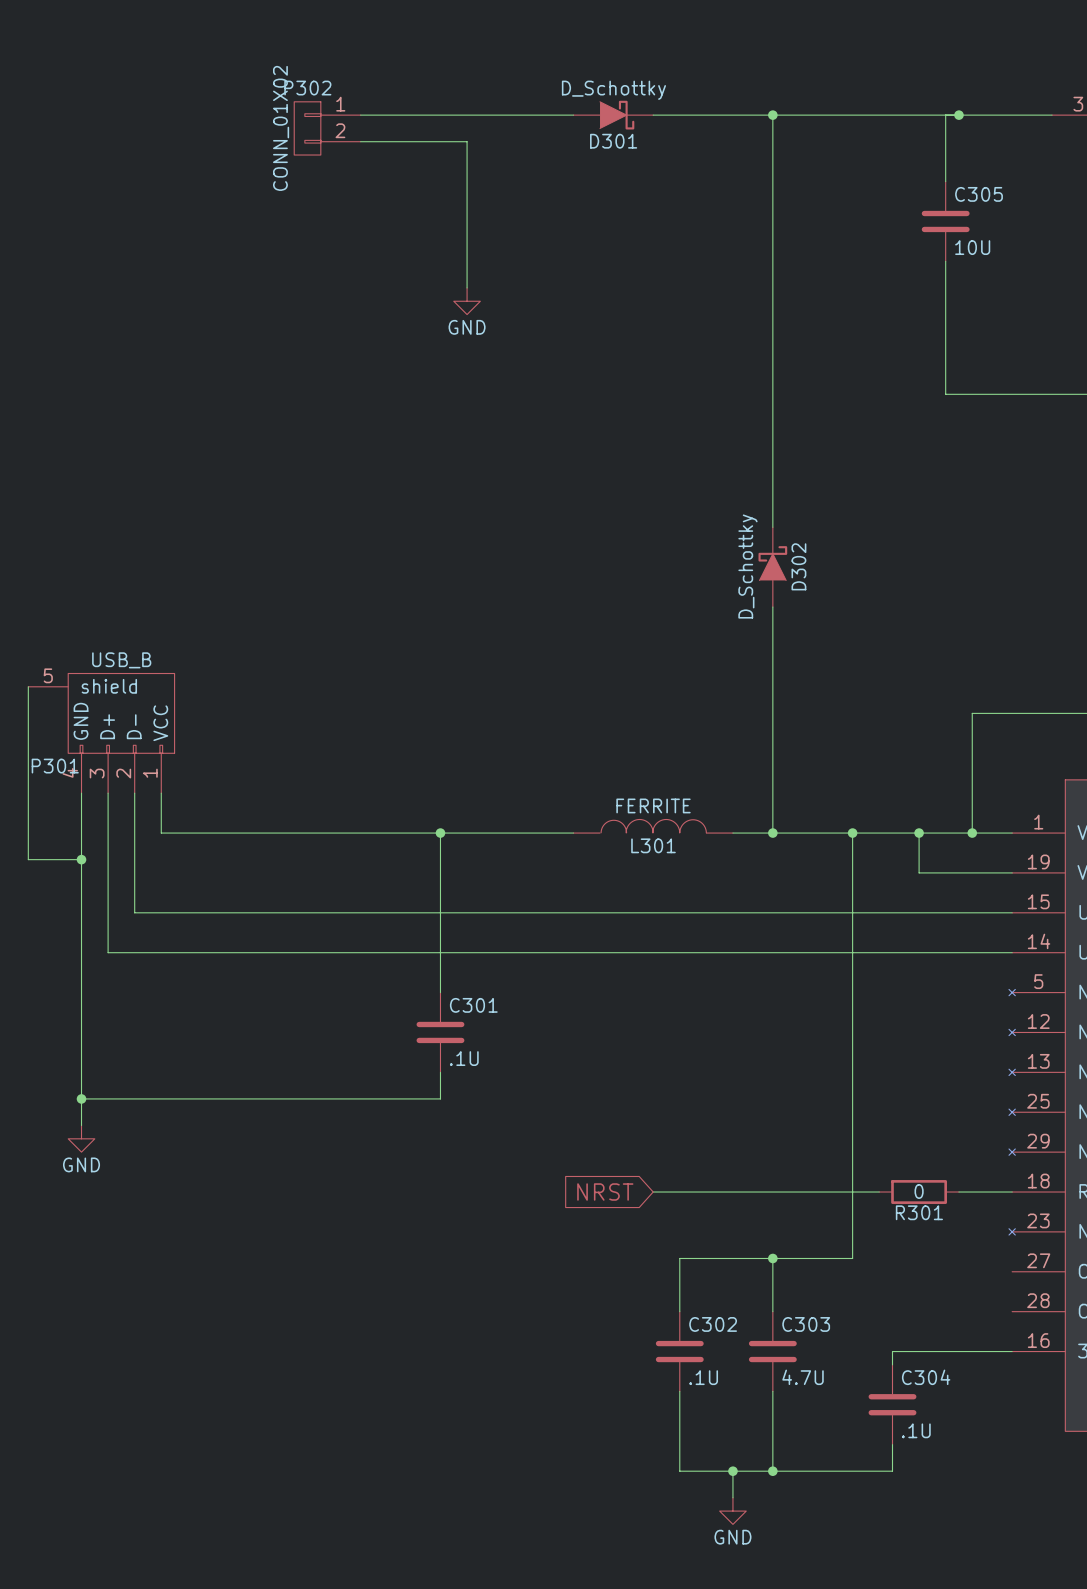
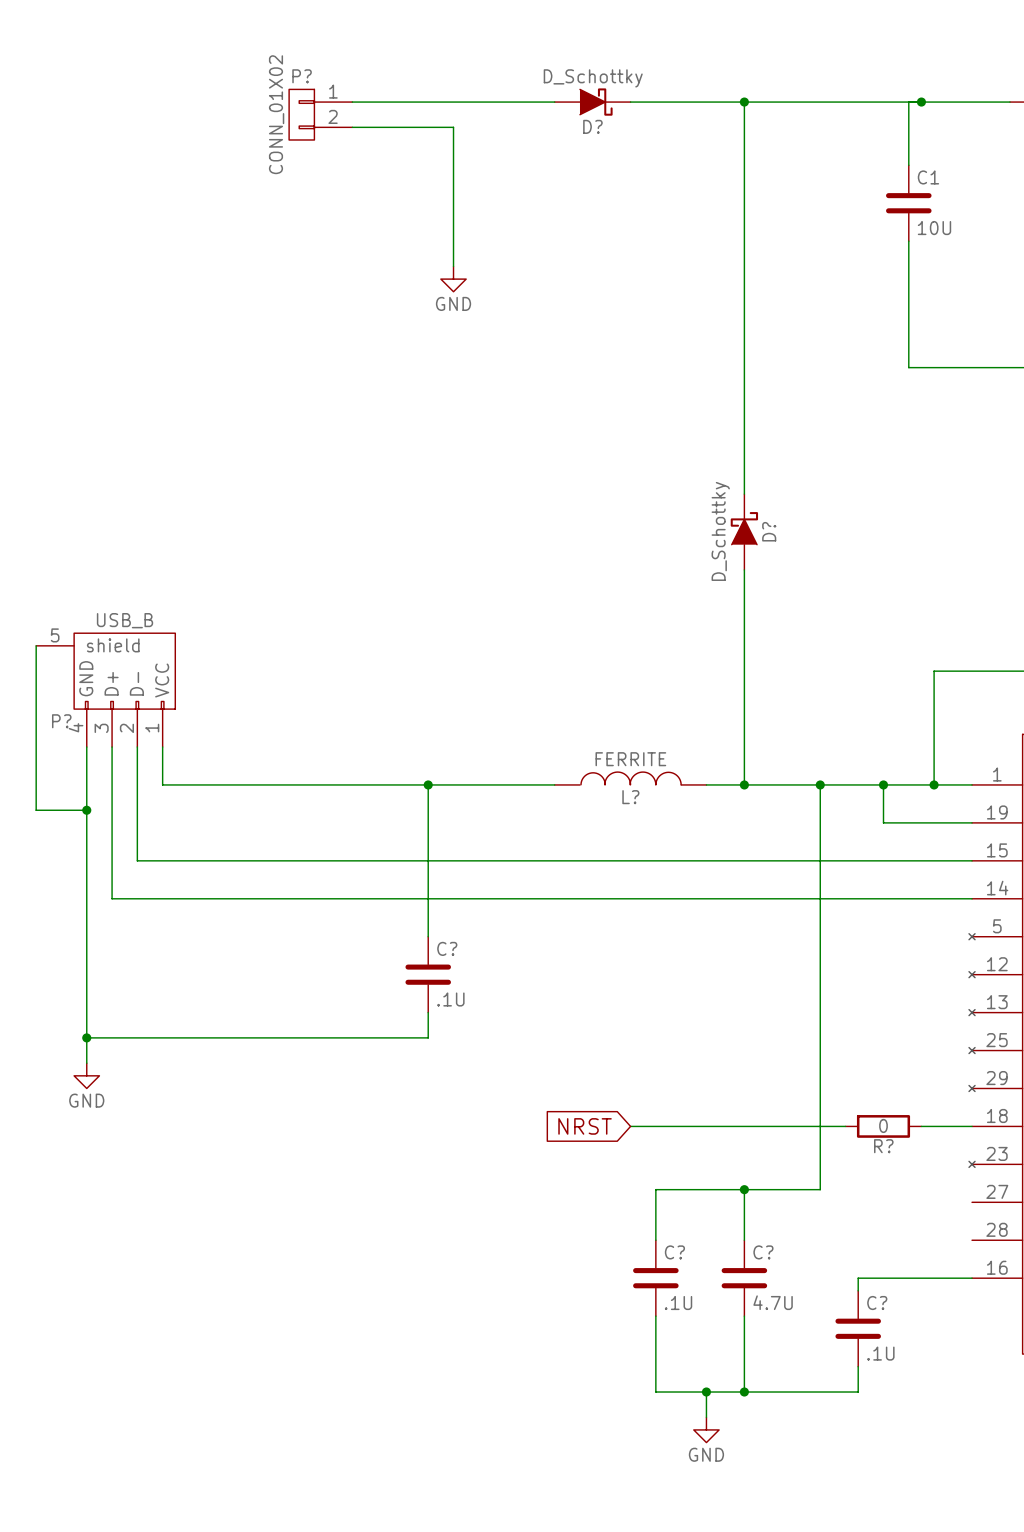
P302 name: P302 (307, 88) -> P? (302, 76)
D301 name: D301 (613, 141) -> D? (592, 126)
C305 name: C305 (979, 194) -> C1 (928, 177)
D302 name: D302 (798, 566) -> D? (769, 531)
P301 name: P301 (55, 766) -> P? (61, 721)
L301 name: L301 (653, 845) -> L? (630, 797)
C301 name: C301 (473, 1005) -> C? (447, 948)
R301 name: R301 (919, 1212) -> R? (883, 1146)
C302 name: C302 (713, 1324) -> C? (674, 1252)
C303 name: C303 (806, 1324) -> C? (763, 1252)
C304 name: C304 (926, 1377) -> C? (877, 1303)

